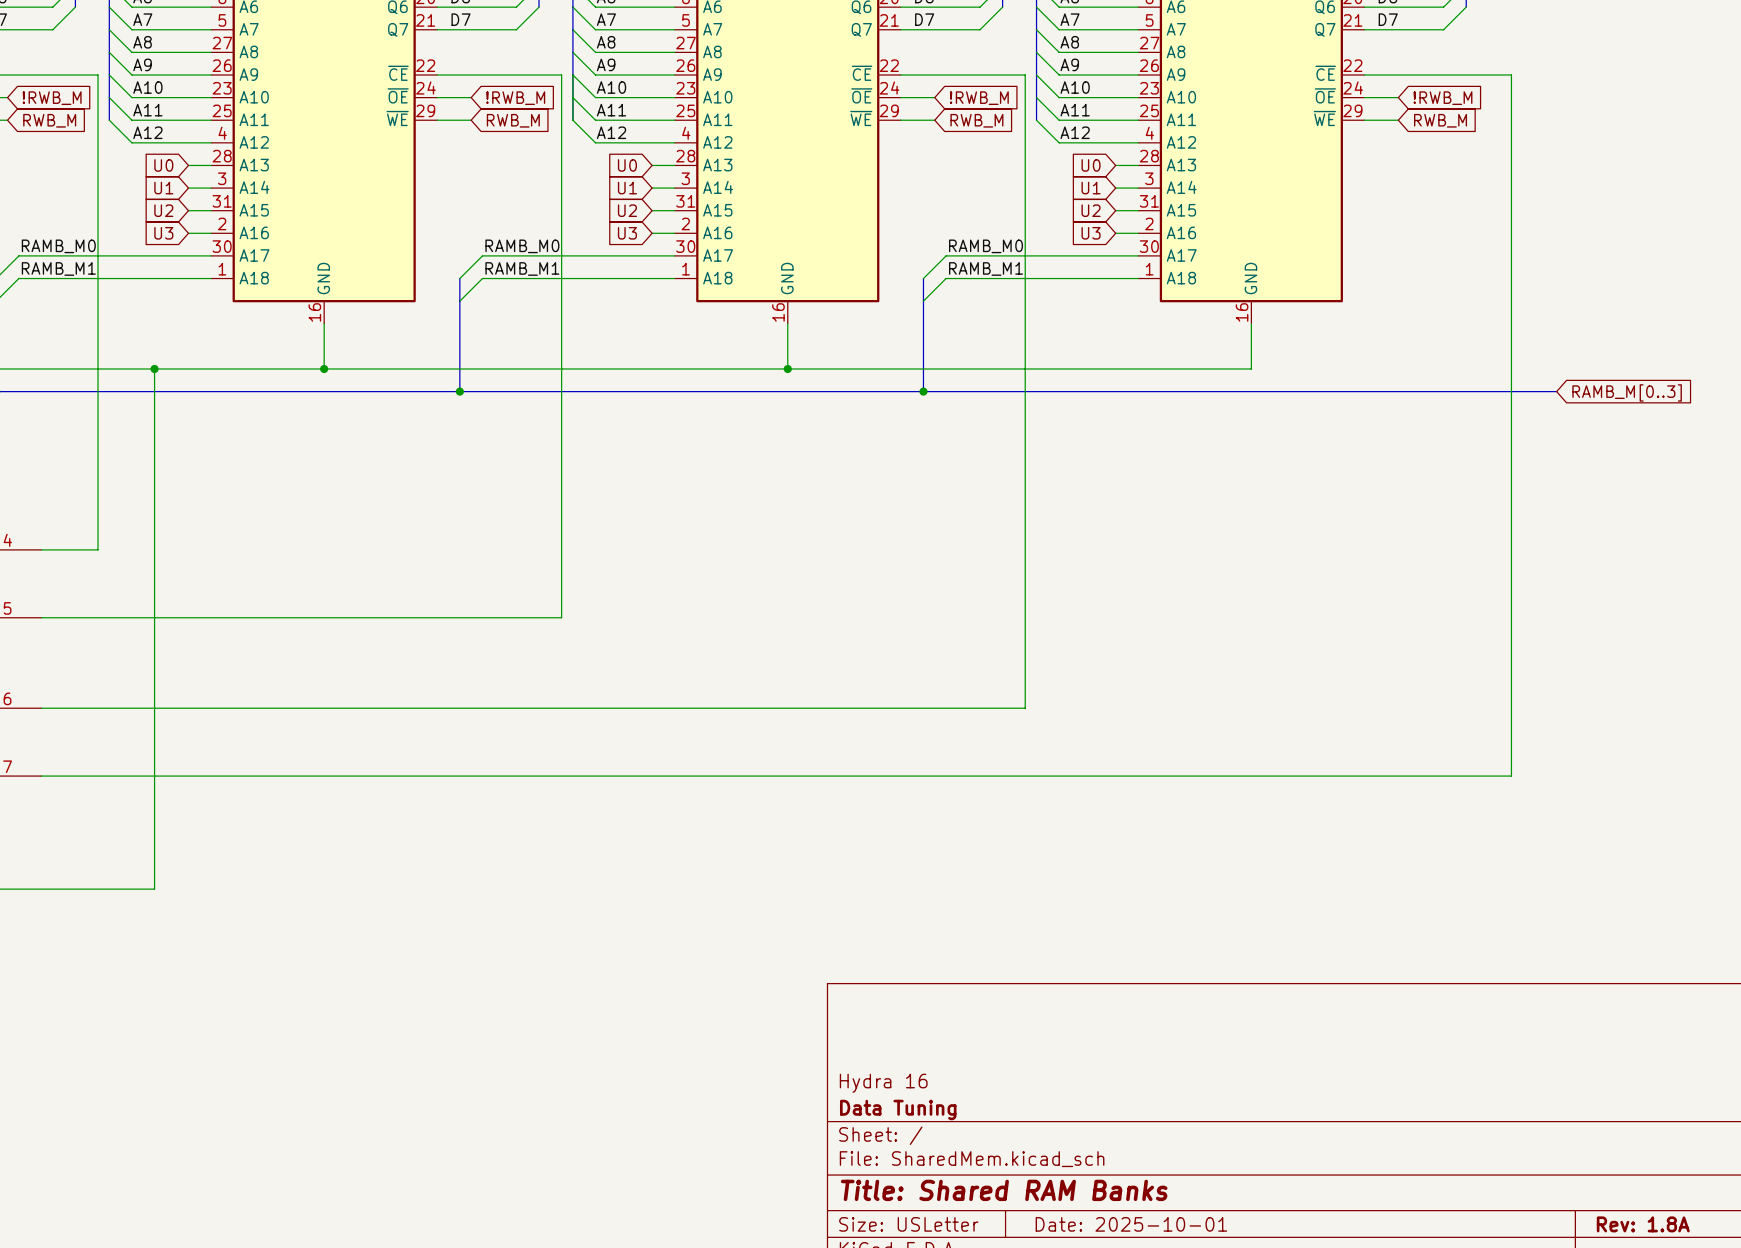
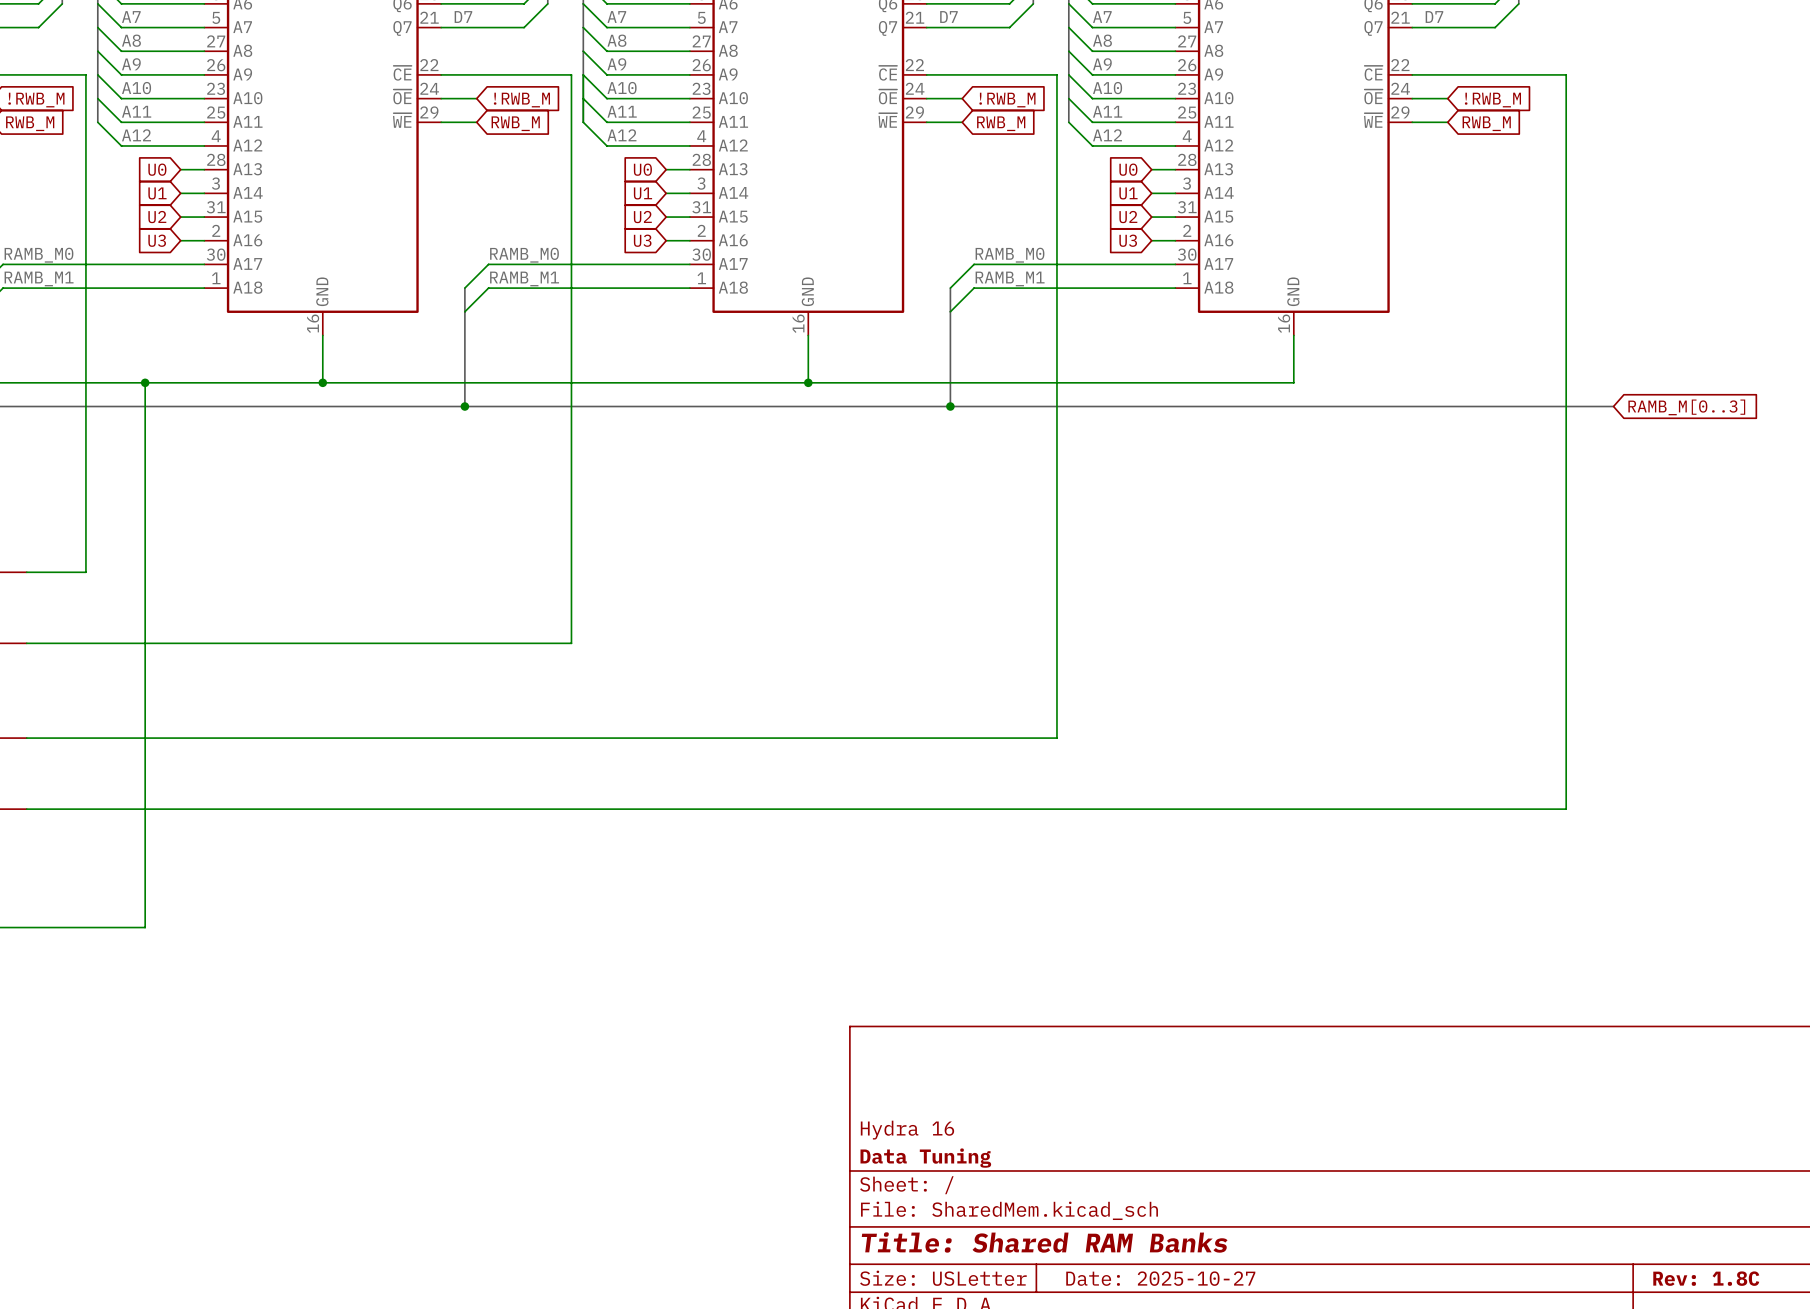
title block: Date: 2025-10-01 (1131, 1224) -> Date: 2025-10-27 (1160, 1278)
title block: Rev: 1.8A (1643, 1224) -> Rev: 1.8C (1706, 1278)

